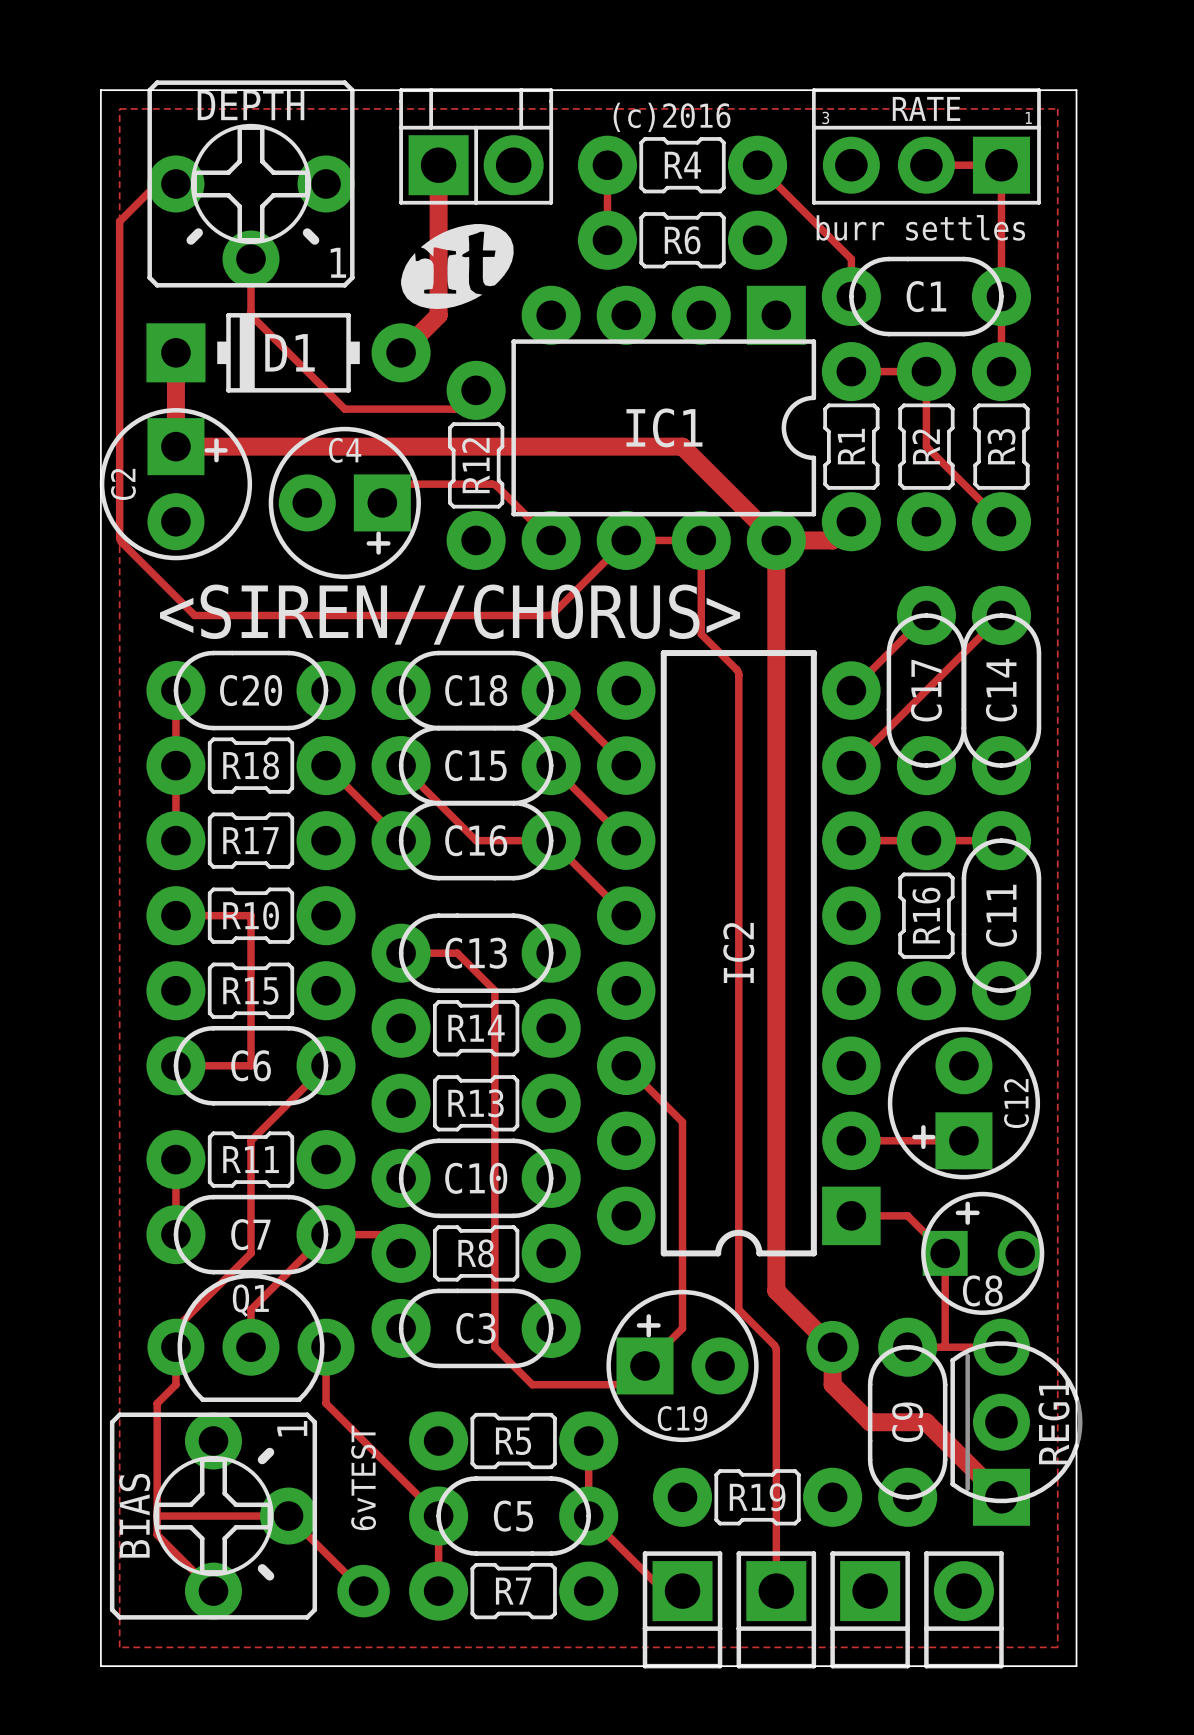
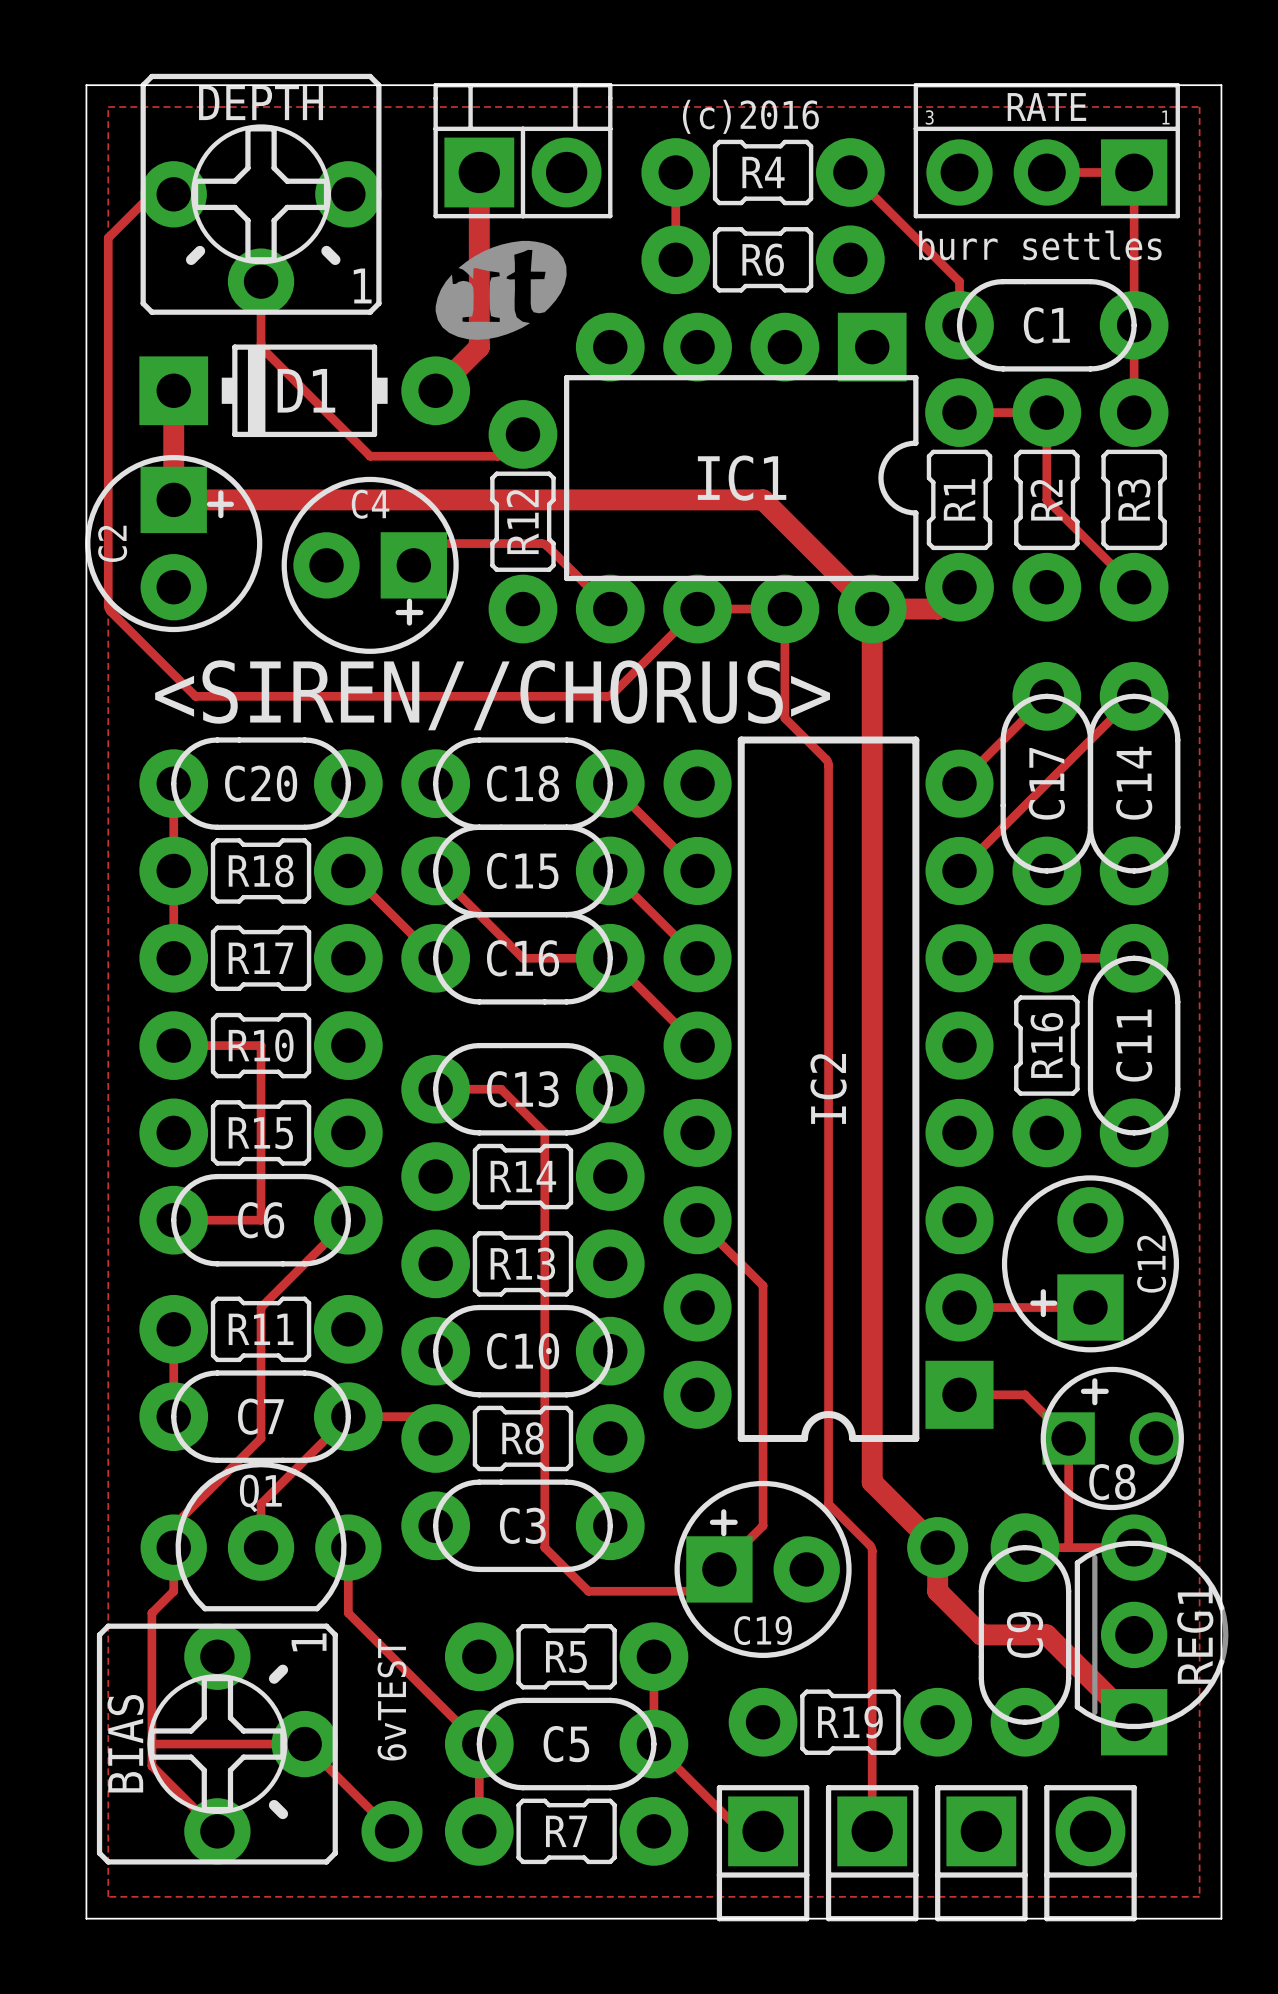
drawing shape: [401, 224, 514, 310] -> [435, 240, 567, 340]

